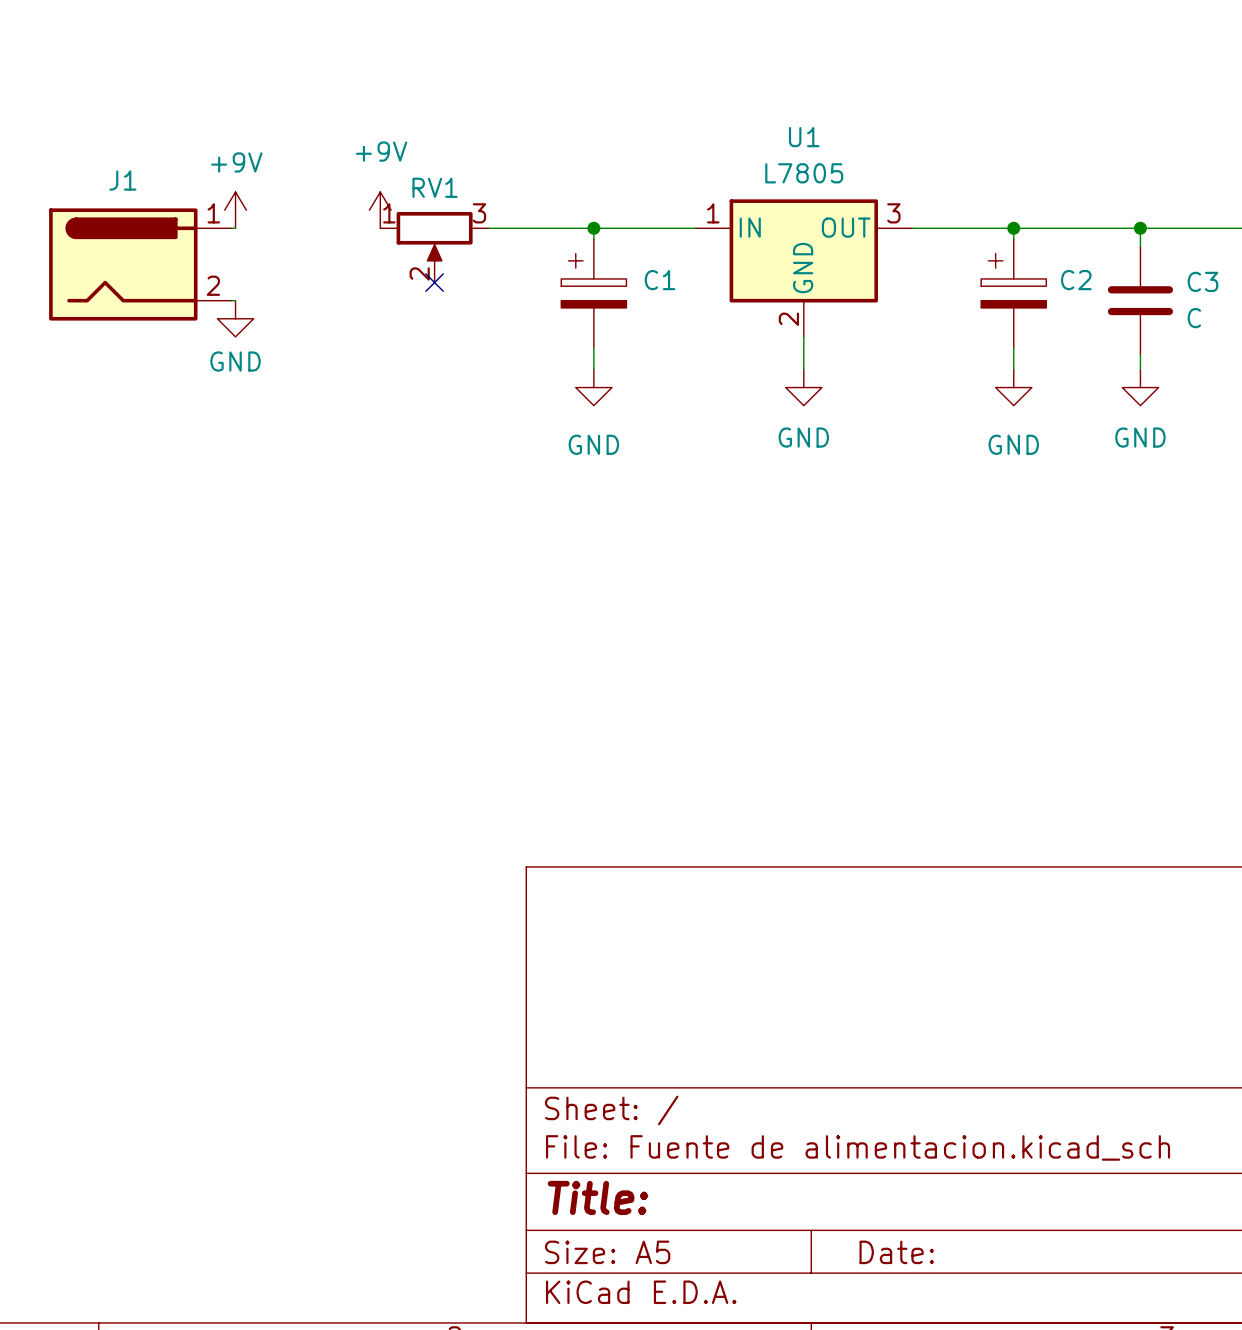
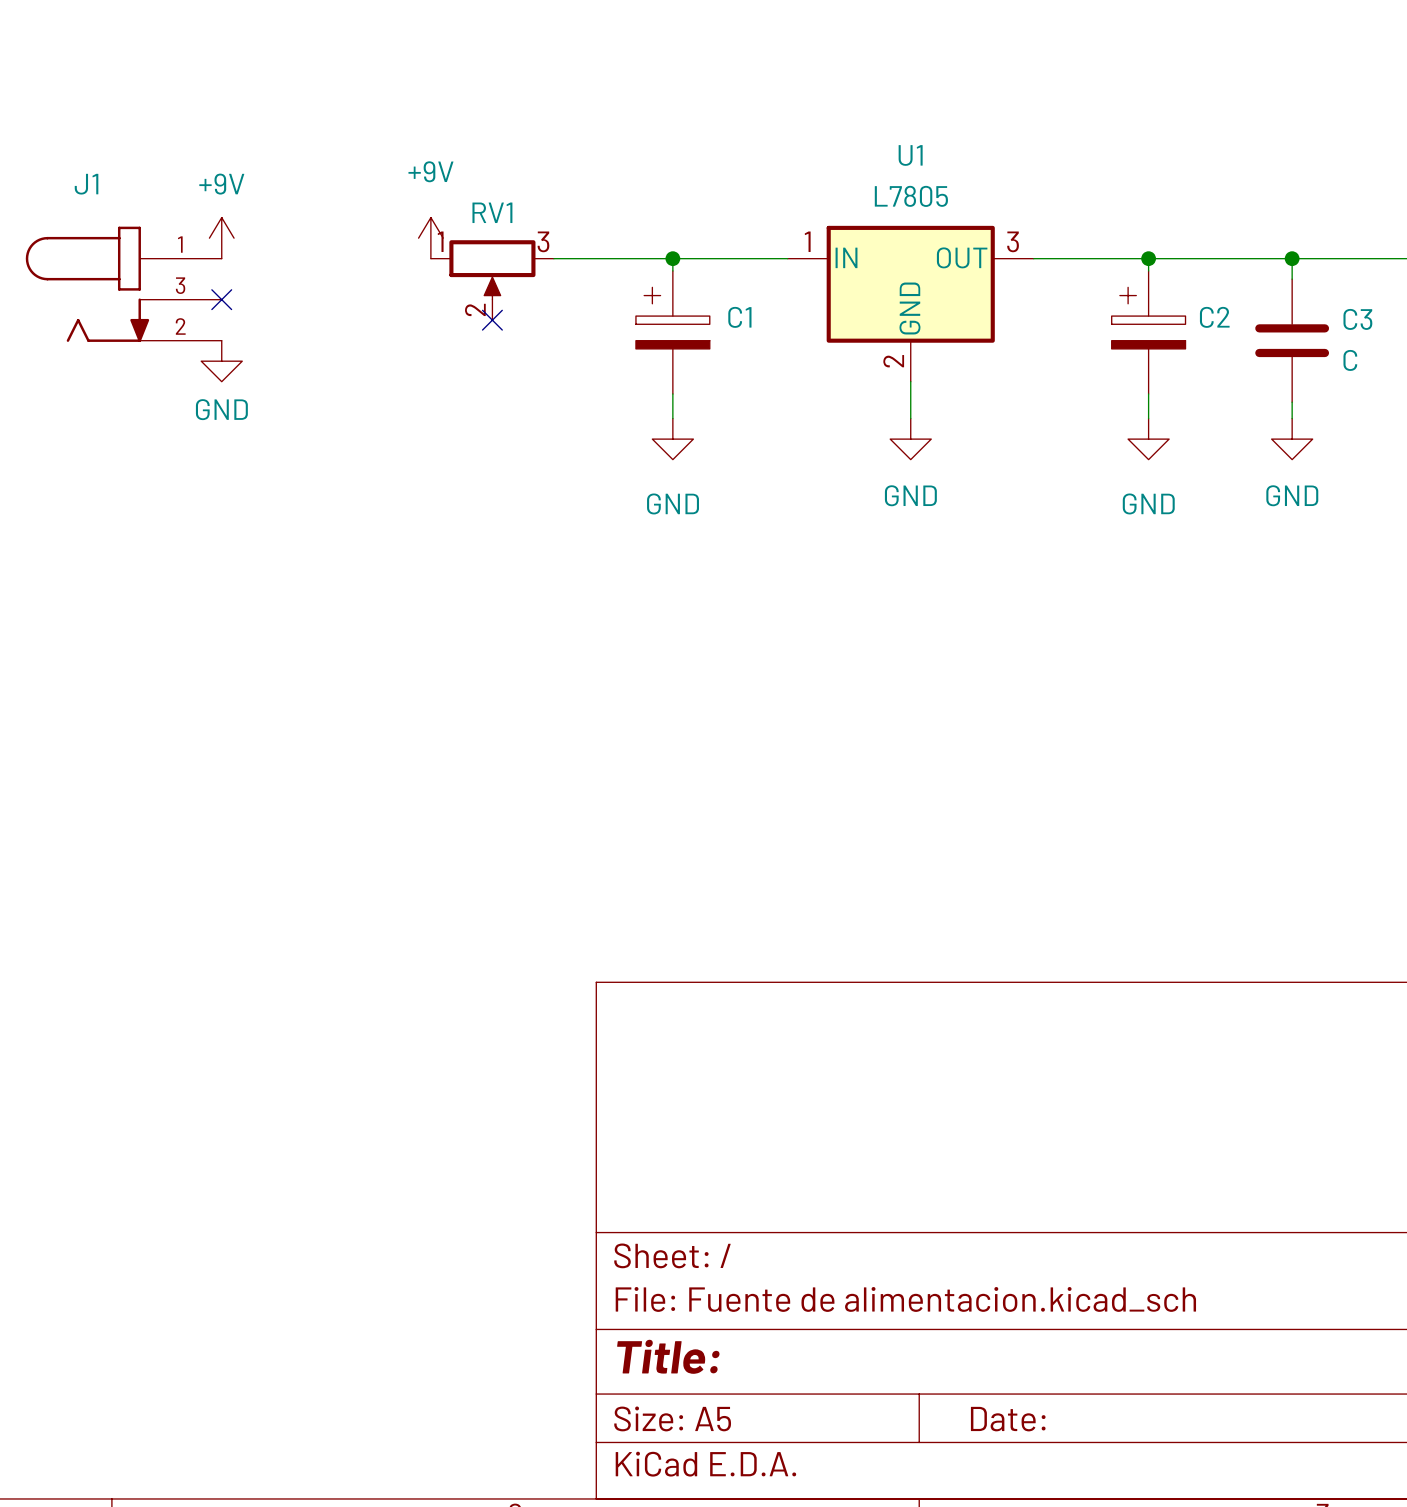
J1 symbol: [49, 208, 232, 321] -> [25, 226, 222, 342]
power symbol position: +9V (235, 210) -> +9V (221, 238)
wire: (231, 228) (235, 228) -> none
no-connect mark: none -> (221, 299)
wire: (231, 300) (235, 300) -> none
power symbol position: GND (235, 318) -> GND (221, 361)

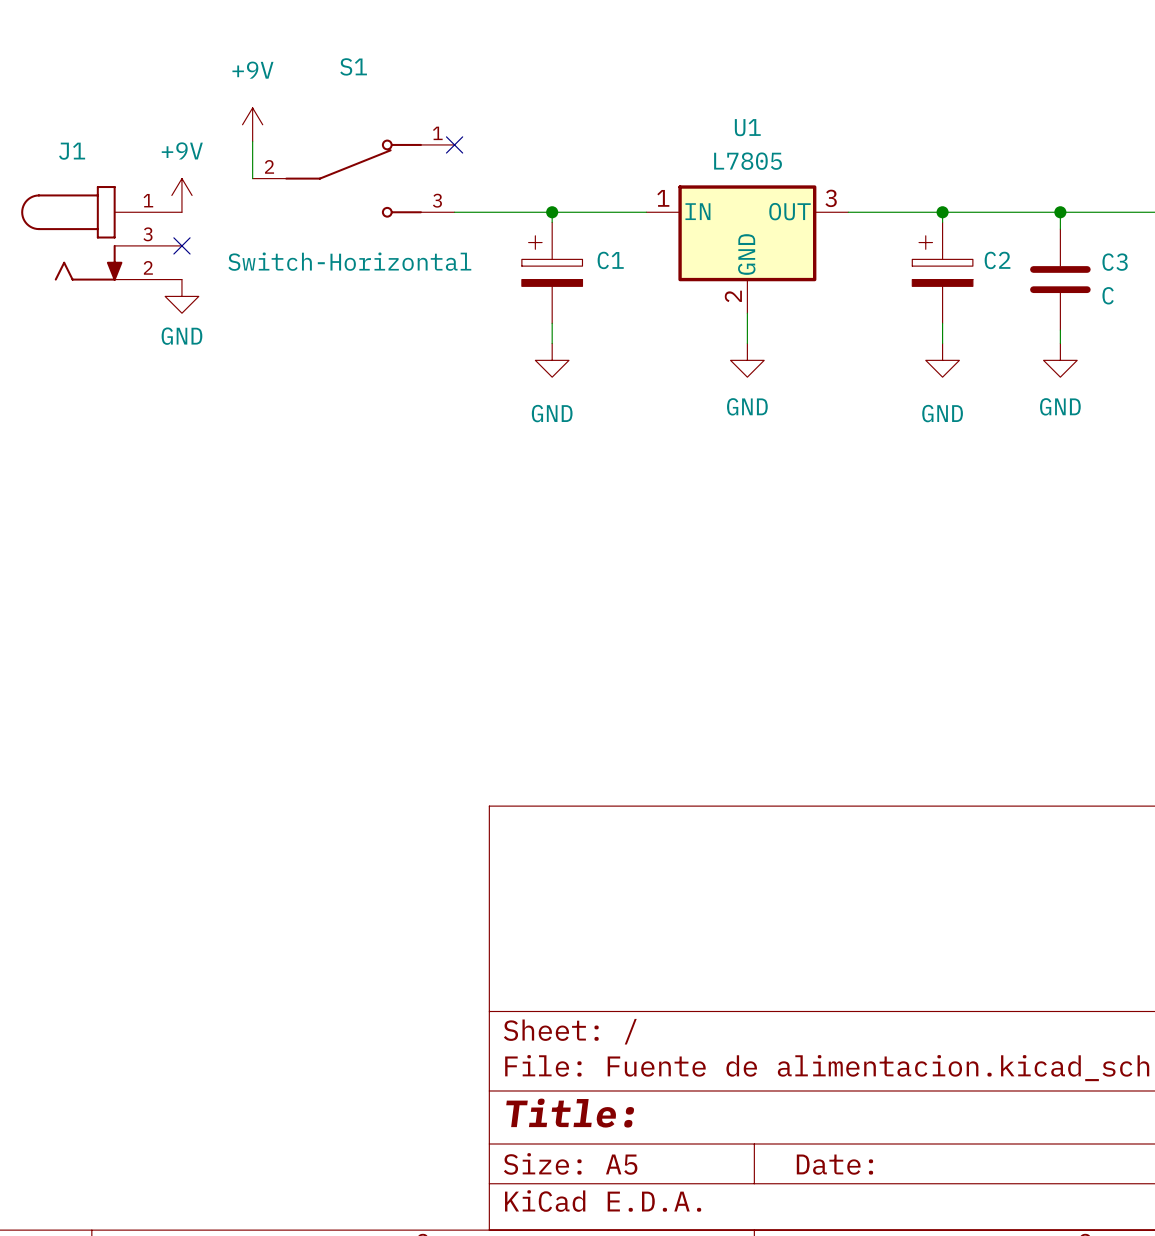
wire: none -> (252, 141) (252, 178)
no-connect mark: none -> (454, 144)
S1: none -> Switch-Horizontal (353, 178)
power symbol position: +9V (430, 238) -> +9V (252, 124)
RV1: (492, 280) -> none
no-connect mark: (492, 320) -> none

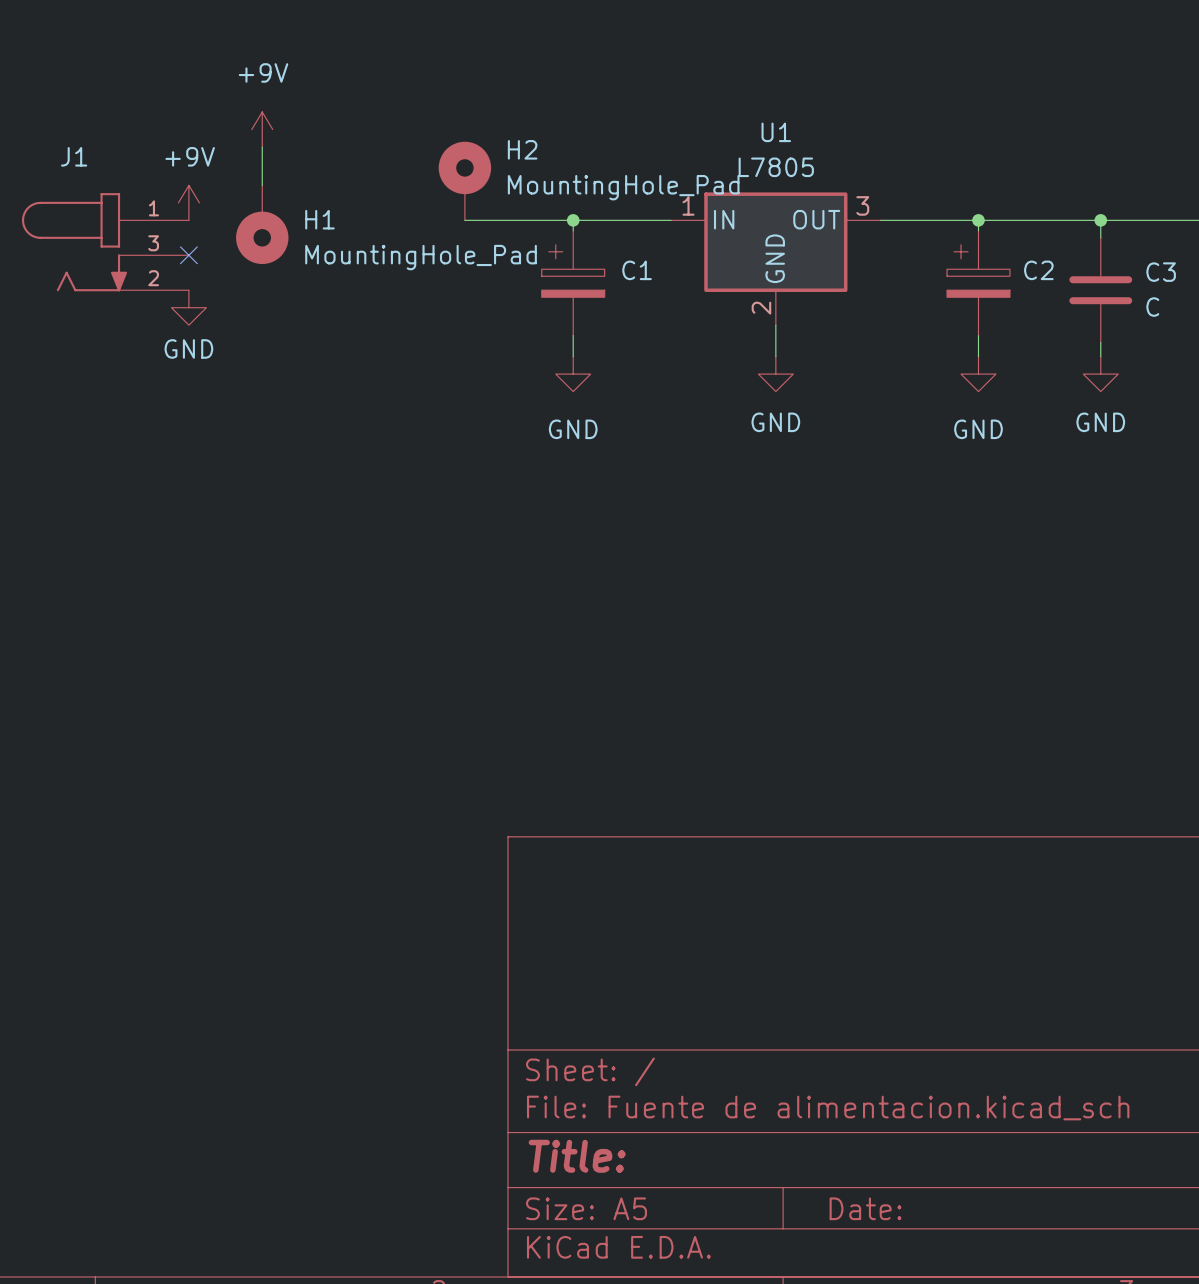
no-connect mark: (454, 144) -> none
H2: none -> MountingHole_Pad (464, 181)
S1: Switch-Horizontal (353, 178) -> none
H1: none -> MountingHole_Pad (262, 224)

